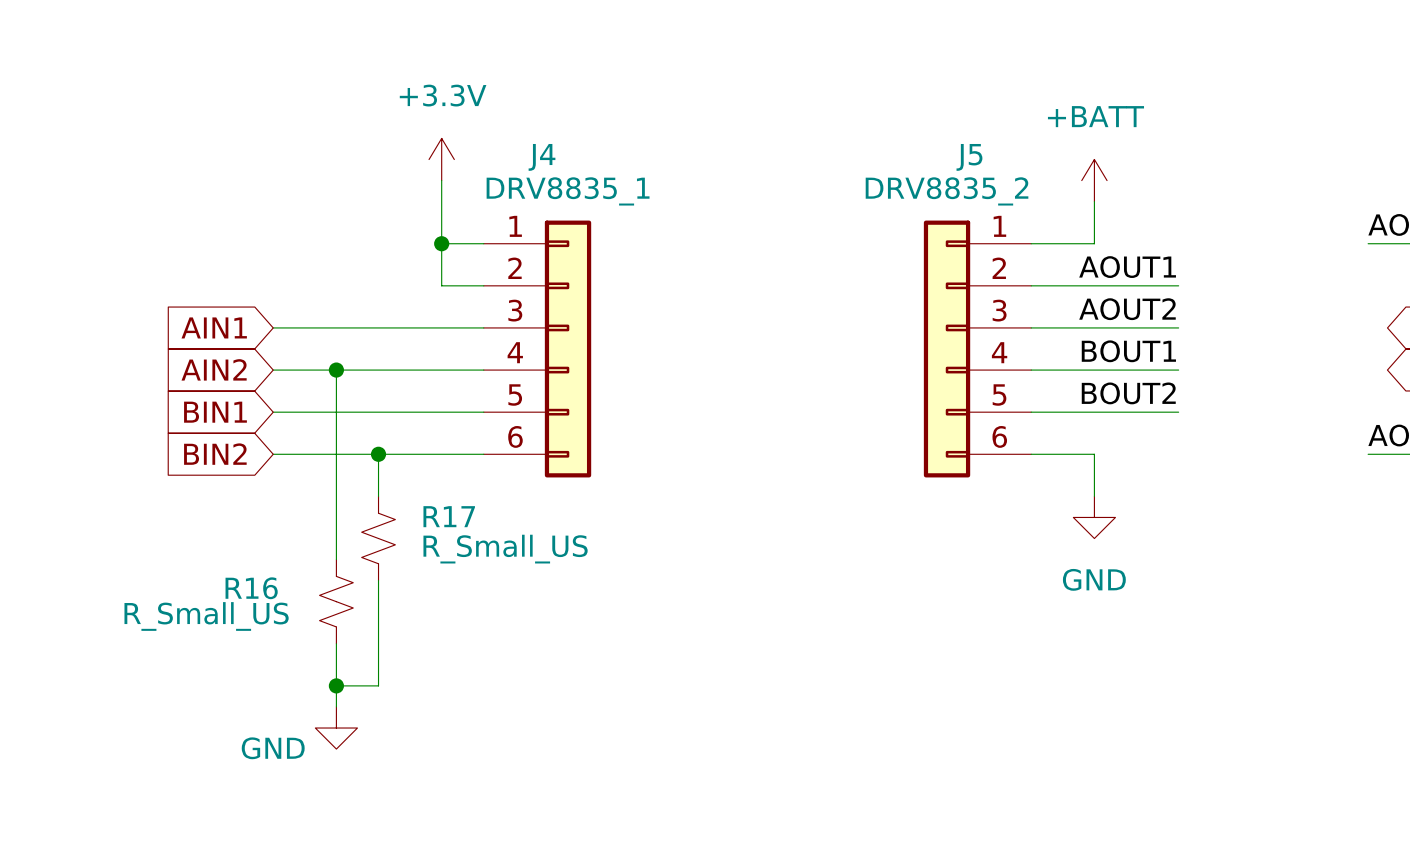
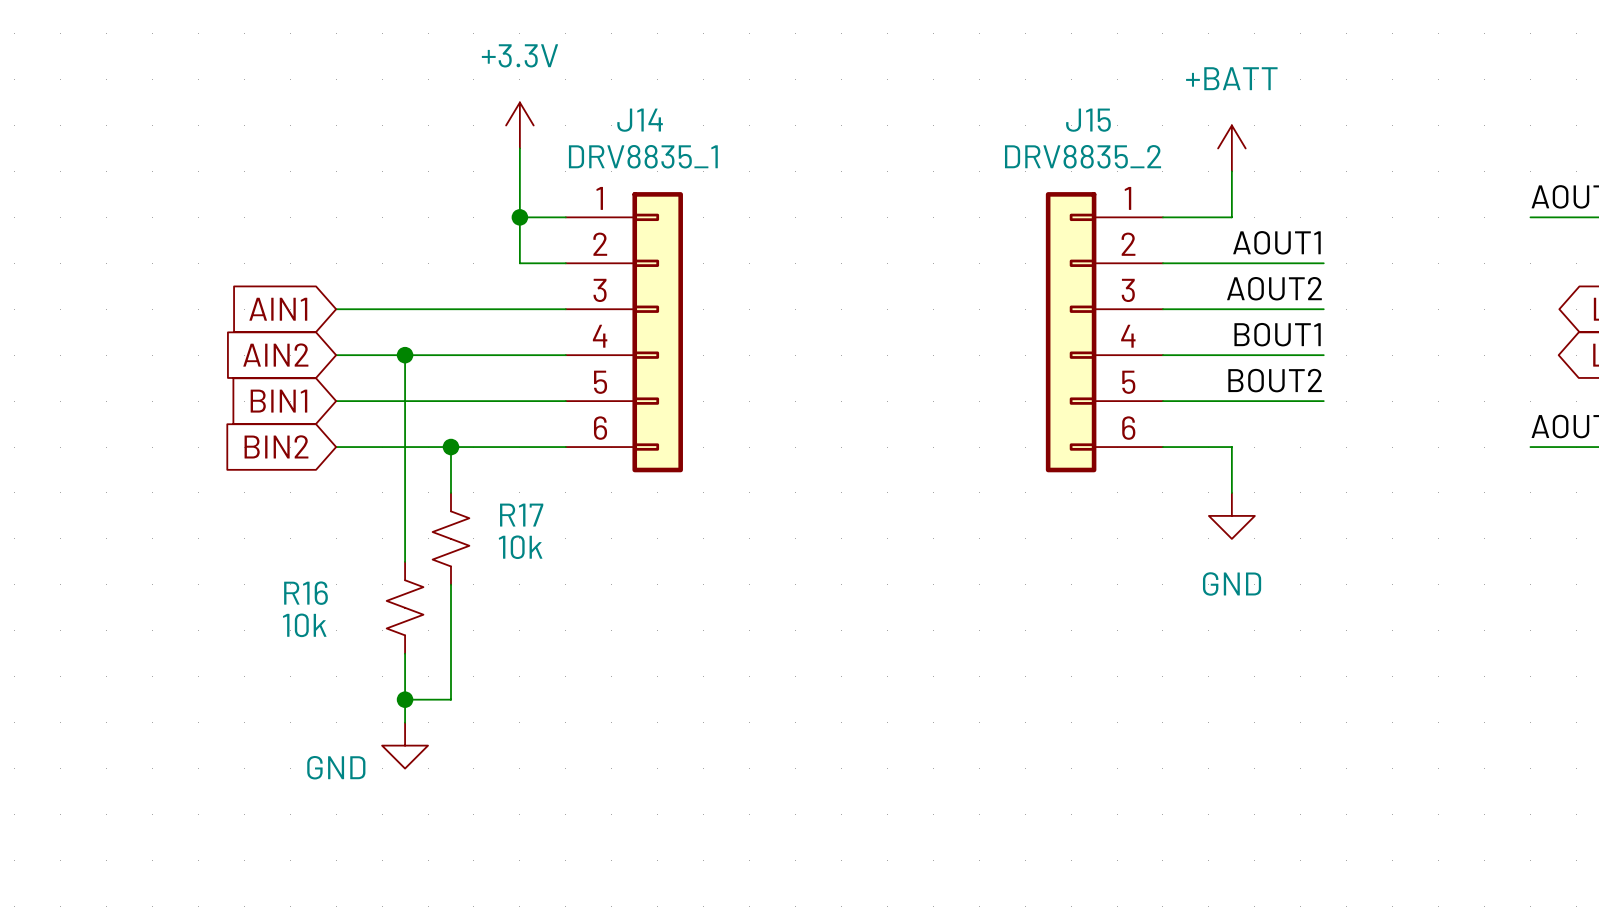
J4 name: J4 (542, 157) -> J14 (640, 120)
J5 name: J5 (969, 157) -> J15 (1088, 120)
R17 value: R_Small_US (505, 549) -> 10k (520, 547)
R16 value: R_Small_US (206, 616) -> 10k (304, 625)

